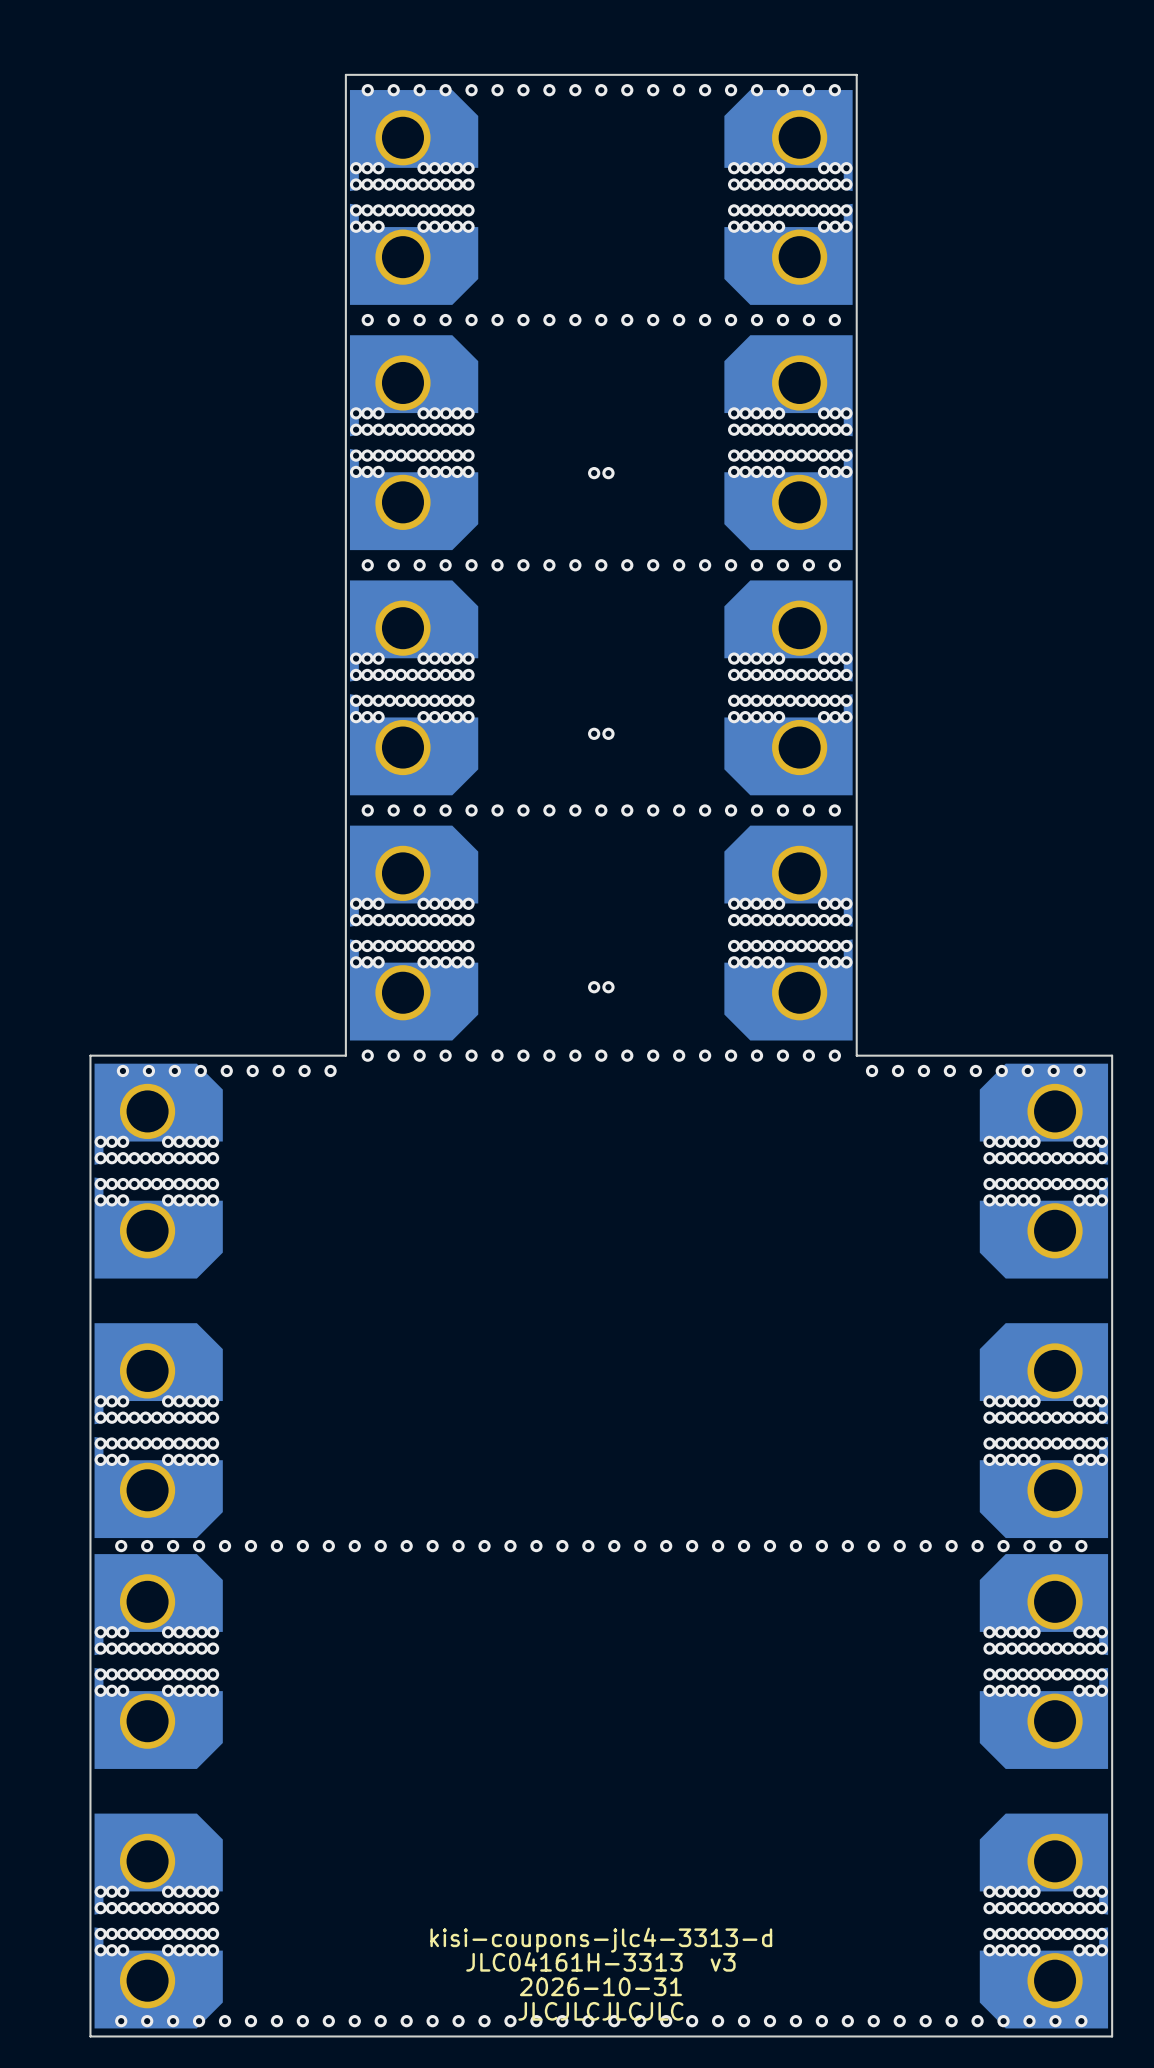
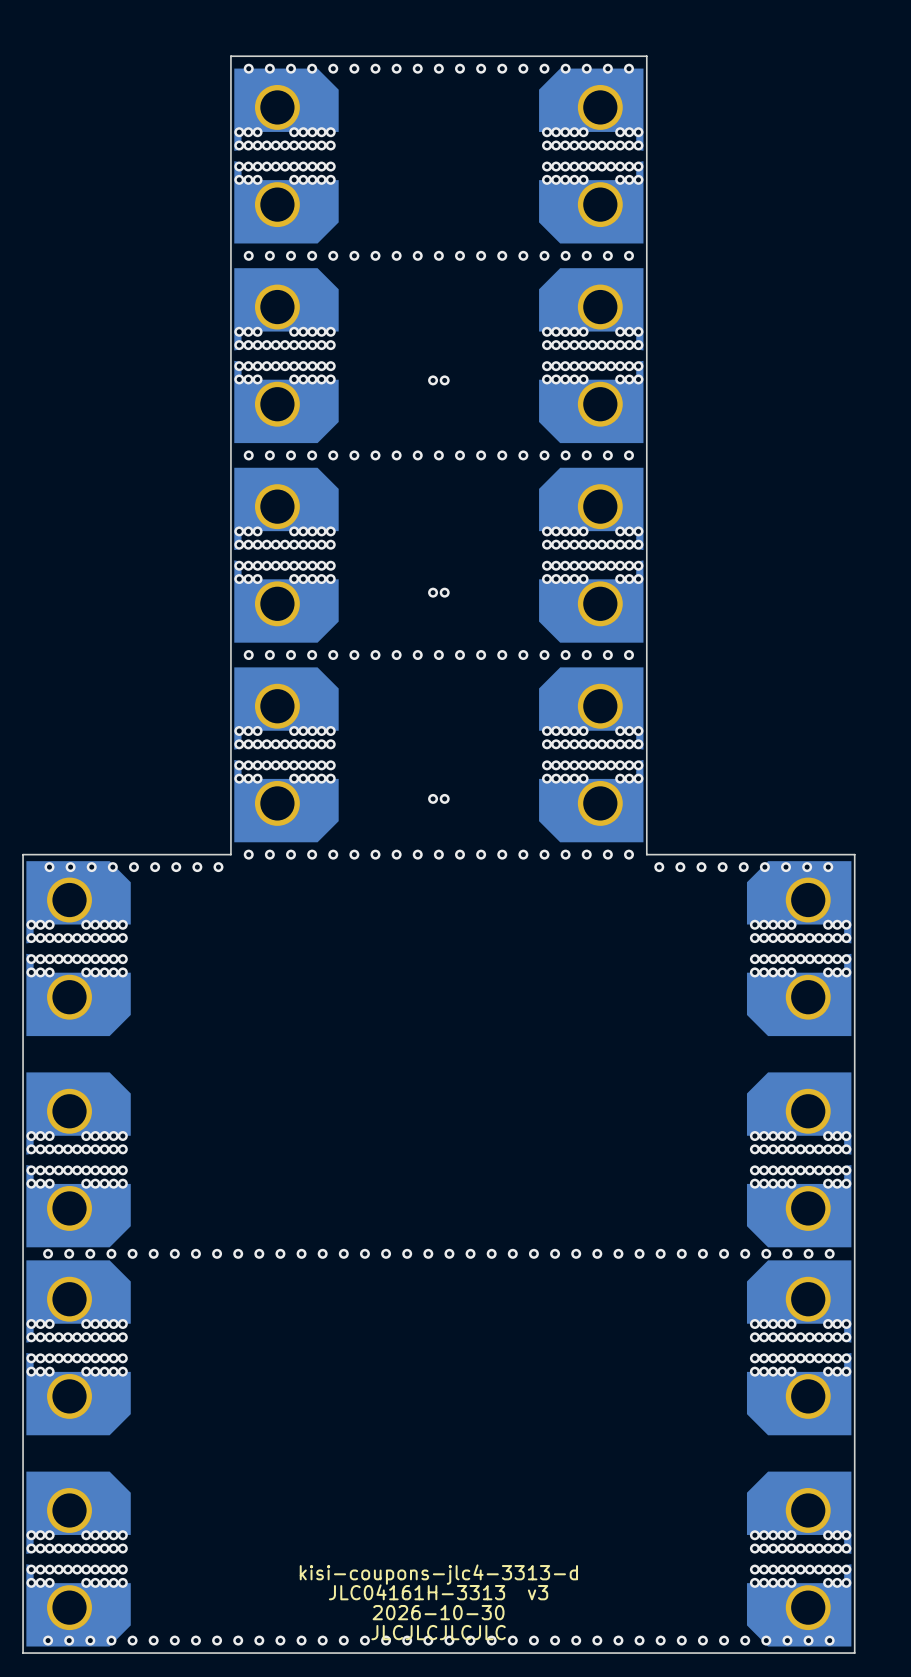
text: 2026-10-31 (600, 1986) -> 2026-10-30 (438, 1612)

